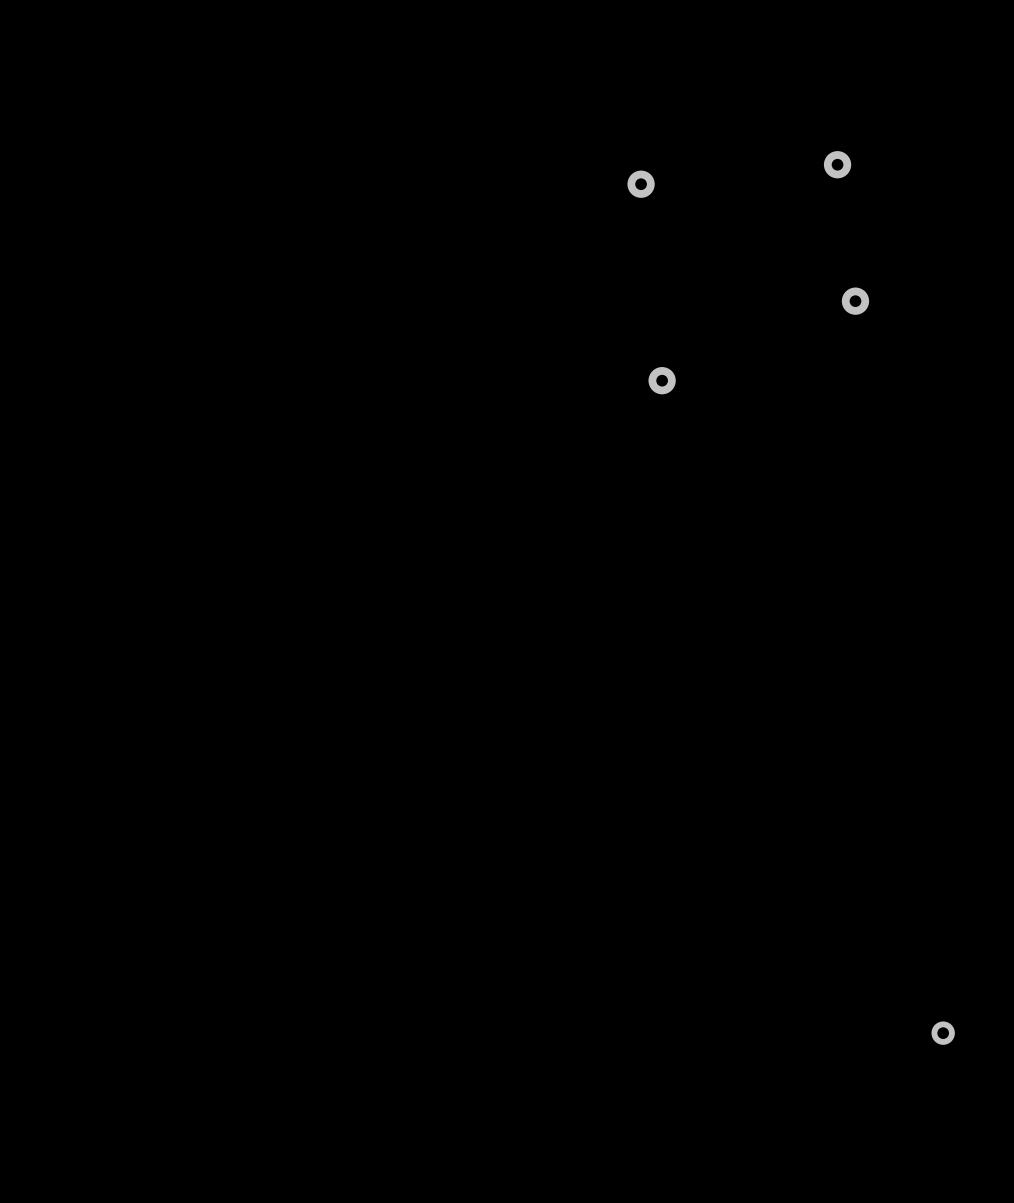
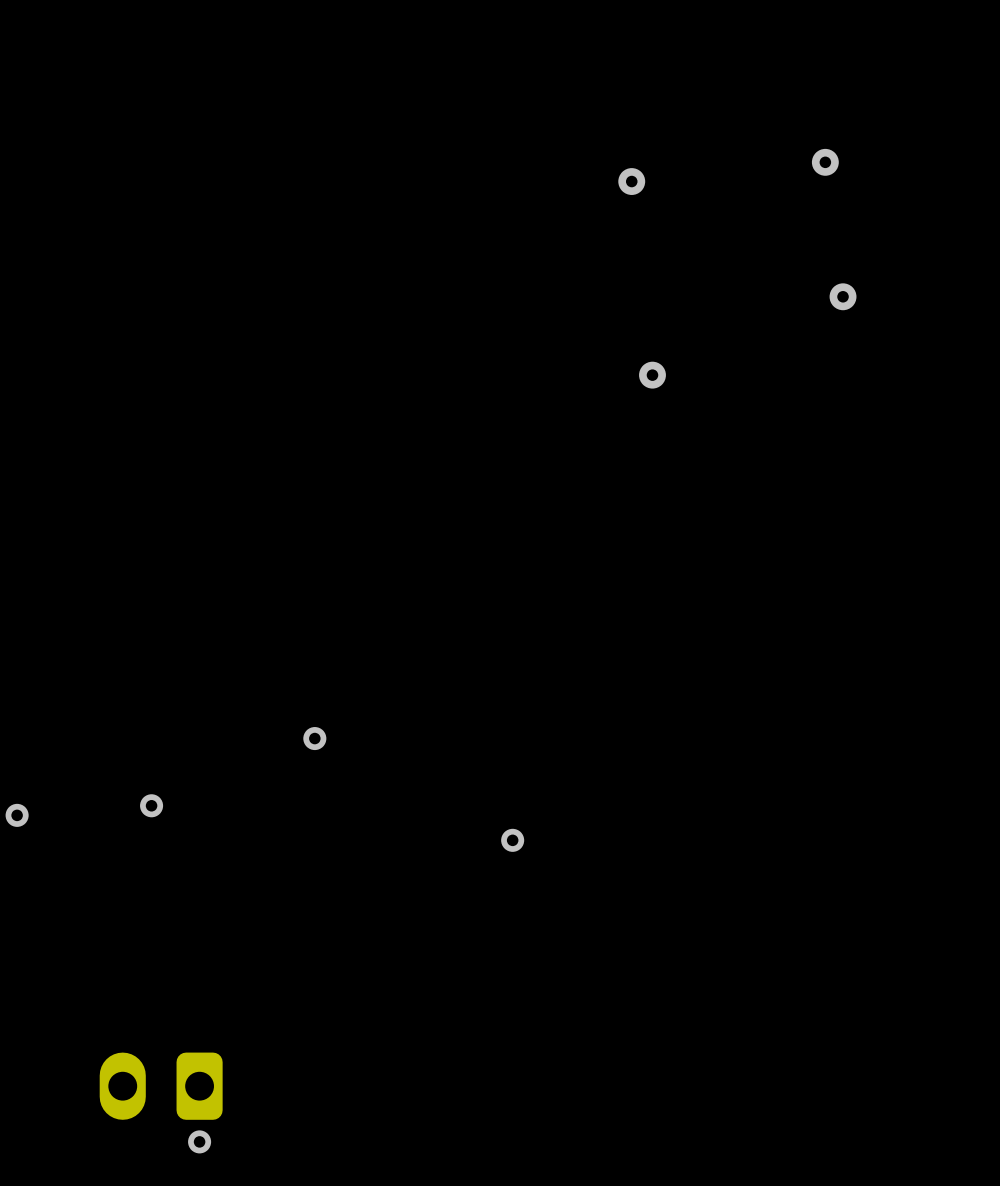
via: none -> (314, 738)
via: none -> (151, 805)
via: none -> (17, 815)
via: none -> (512, 840)
via: (943, 1033) -> none
part: none -> (161, 1086)
via: none -> (199, 1141)

